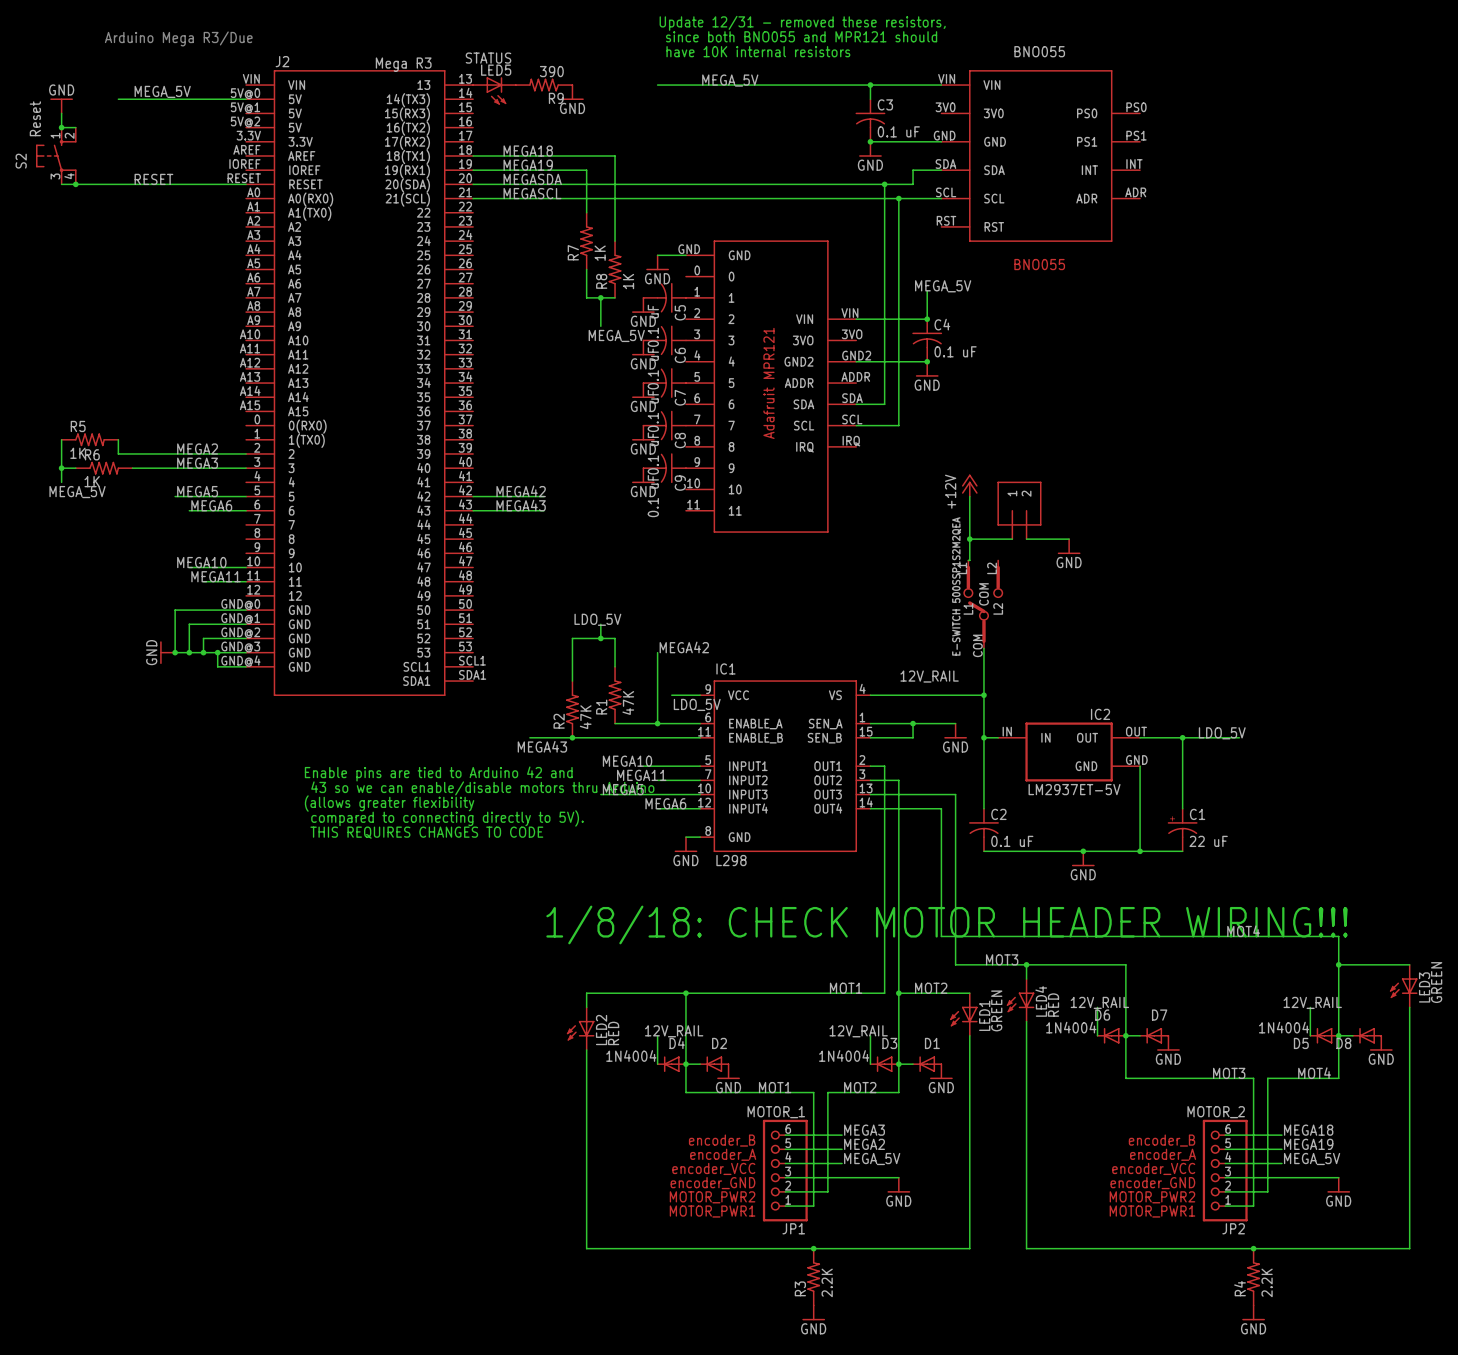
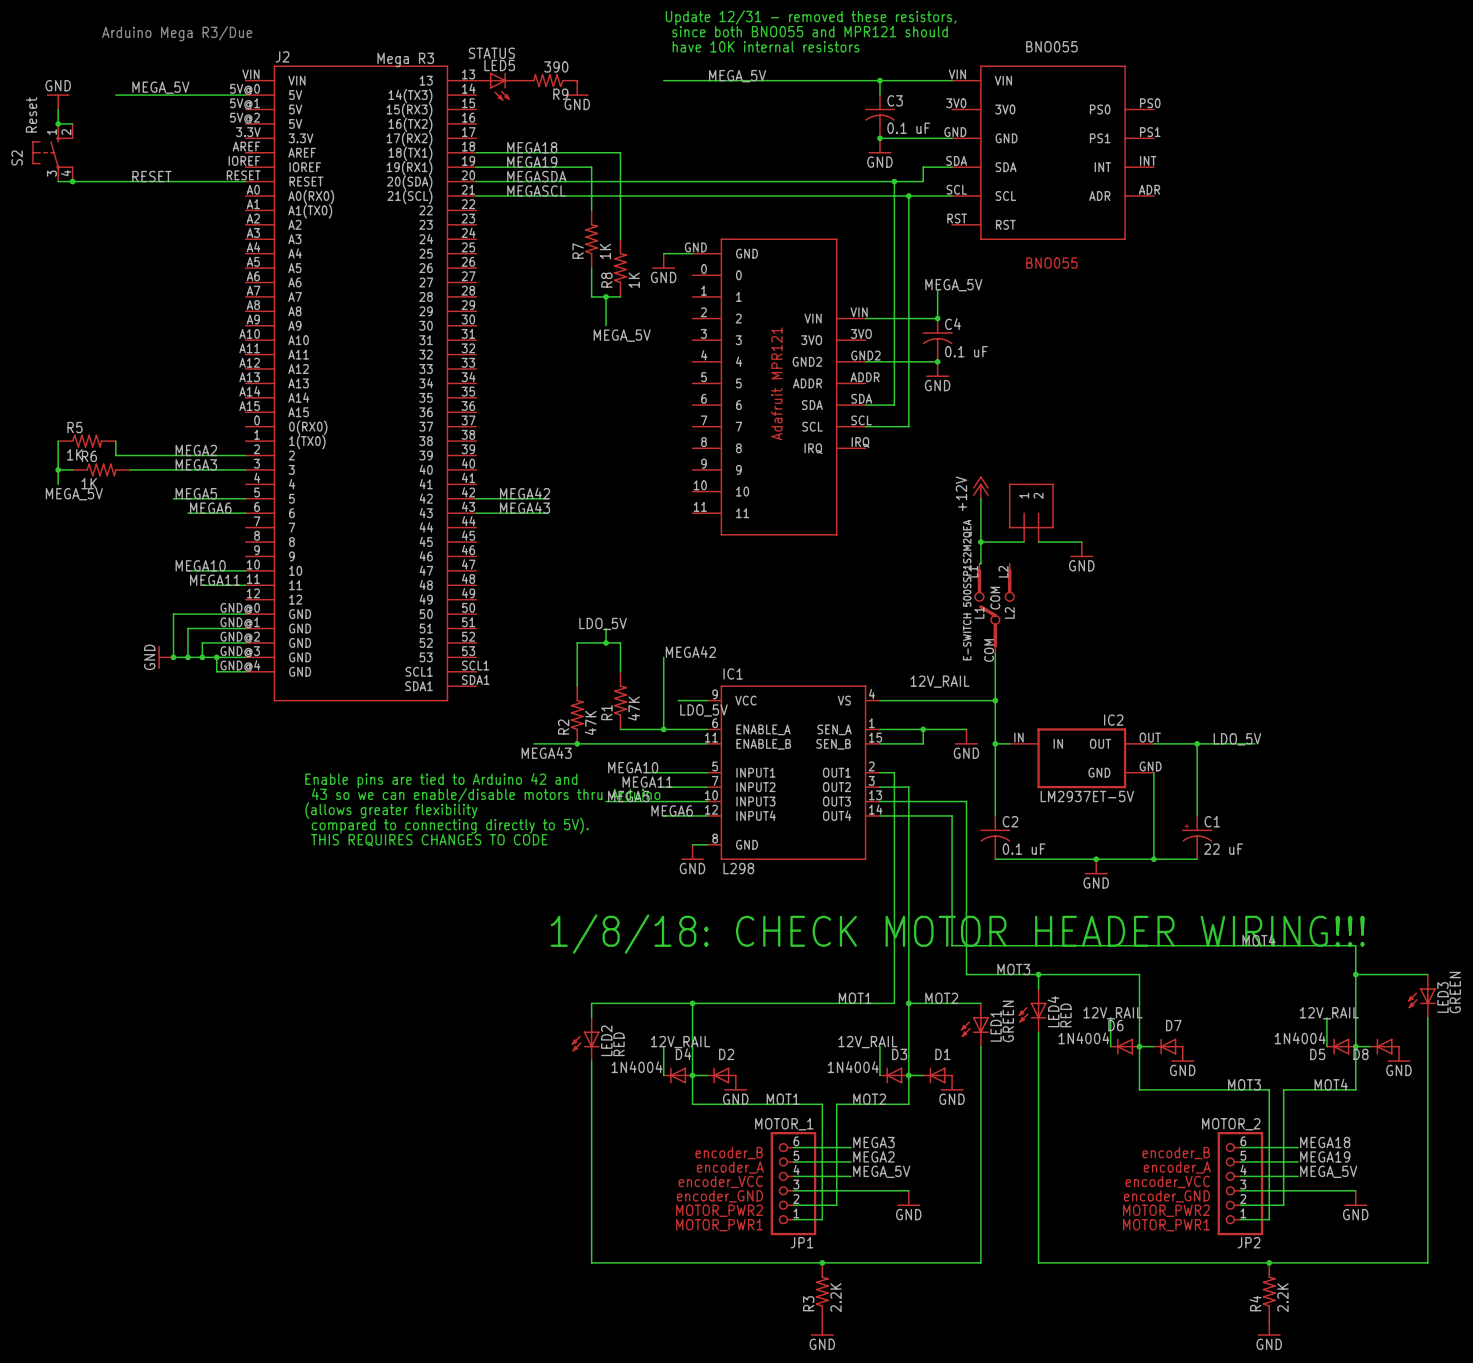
C5: 0.1 uF (664, 297) -> none
power symbol: GND (643, 305) -> none
C6: 0.1 uF (664, 340) -> none
power symbol: GND (643, 347) -> none
C7: 0.1 uF (664, 383) -> none
power symbol: GND (643, 390) -> none
C8: 0.1 uF (664, 425) -> none
power symbol: GND (643, 433) -> none
C9: 0.1 uF (664, 468) -> none
power symbol: GND (643, 475) -> none

